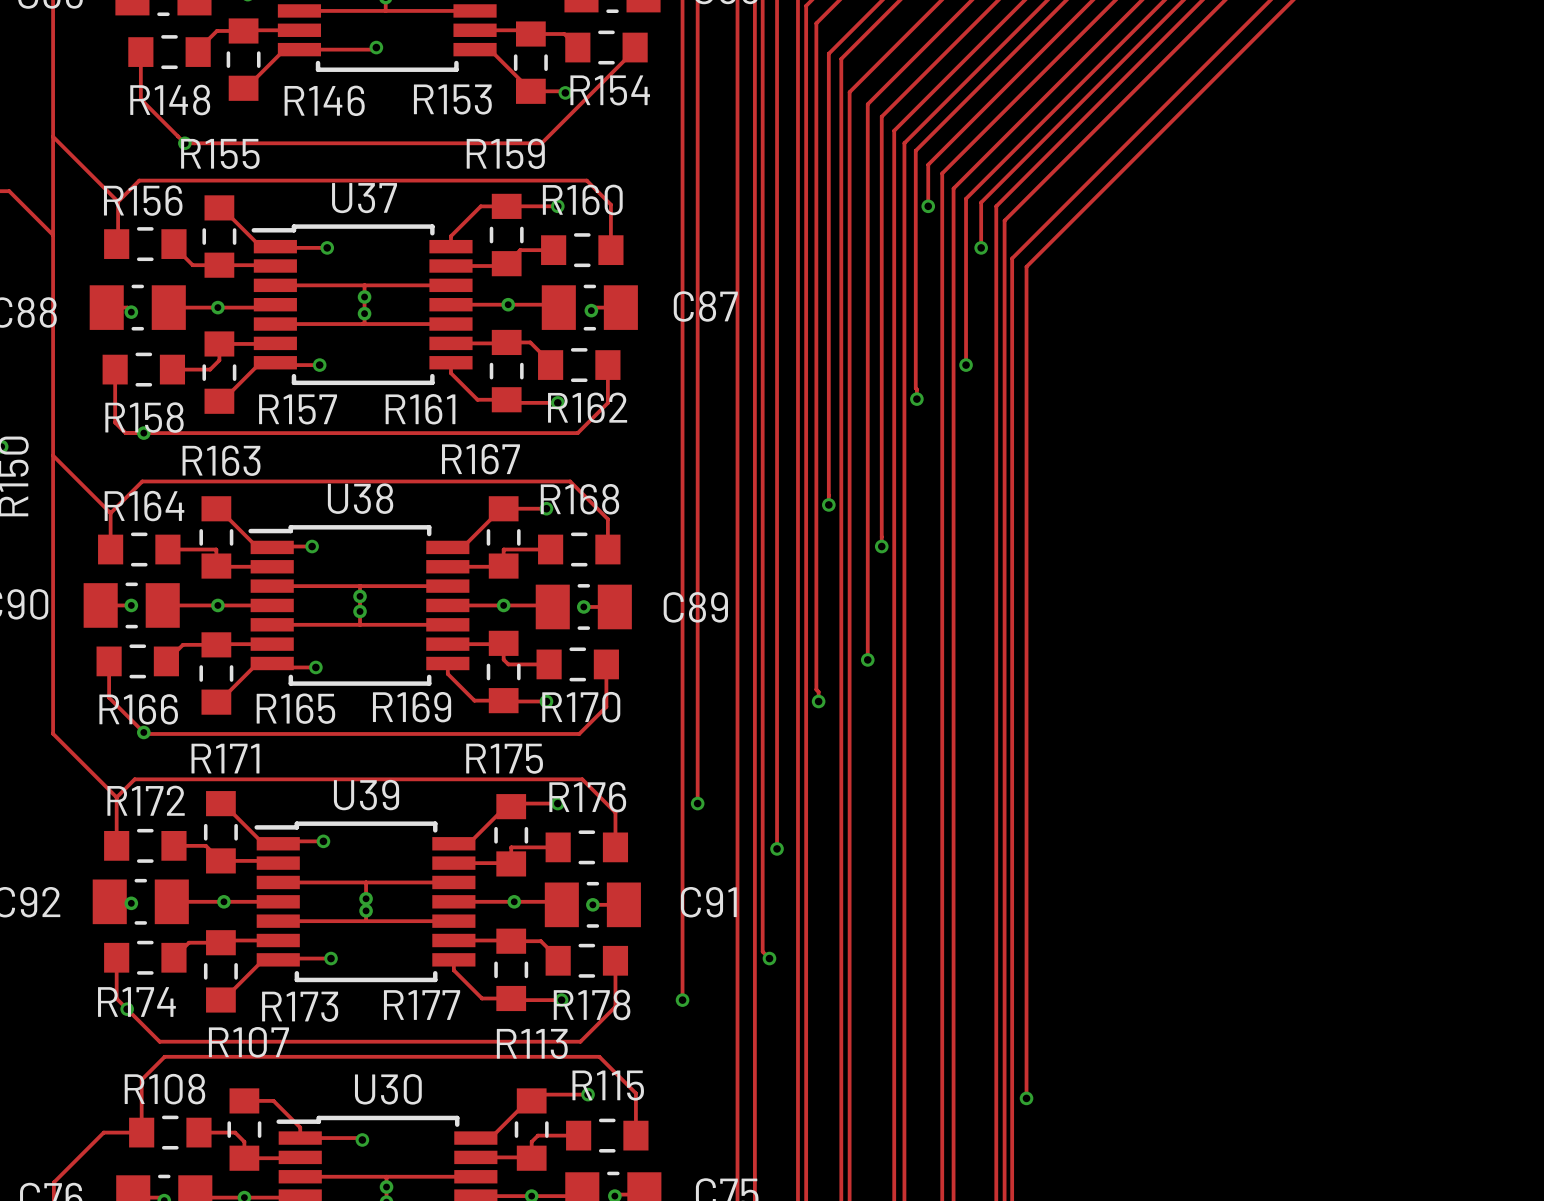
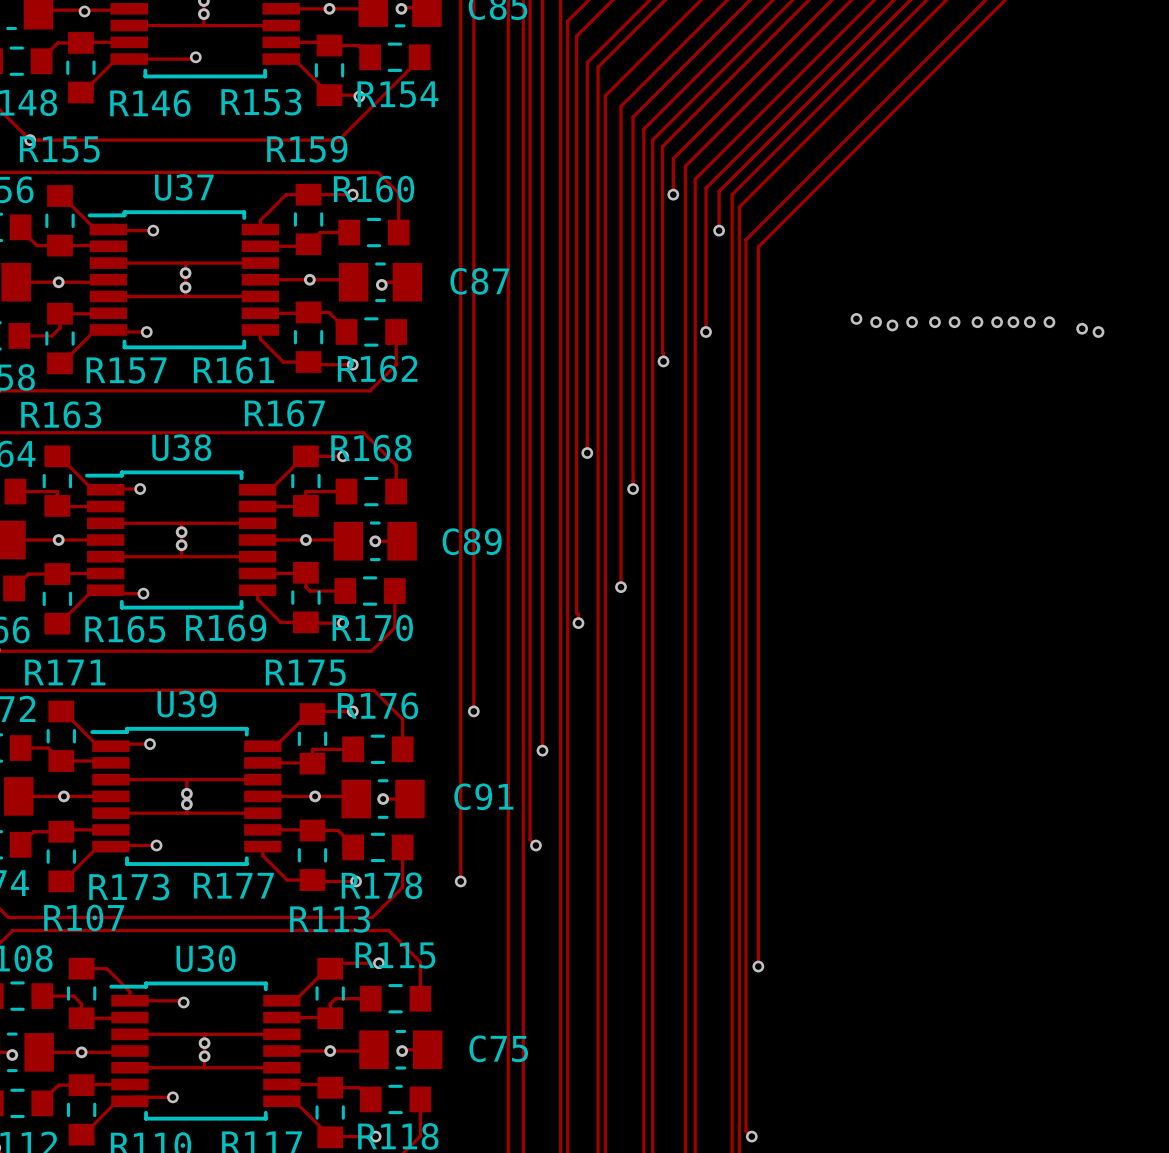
via: none -> (856, 318)
via: none -> (876, 322)
via: none -> (912, 322)
via: none -> (934, 322)
via: none -> (954, 322)
via: none -> (977, 322)
via: none -> (997, 322)
via: none -> (1013, 322)
via: none -> (1029, 322)
via: none -> (1049, 322)
via: none -> (892, 325)
via: none -> (1082, 328)
via: none -> (1098, 332)

